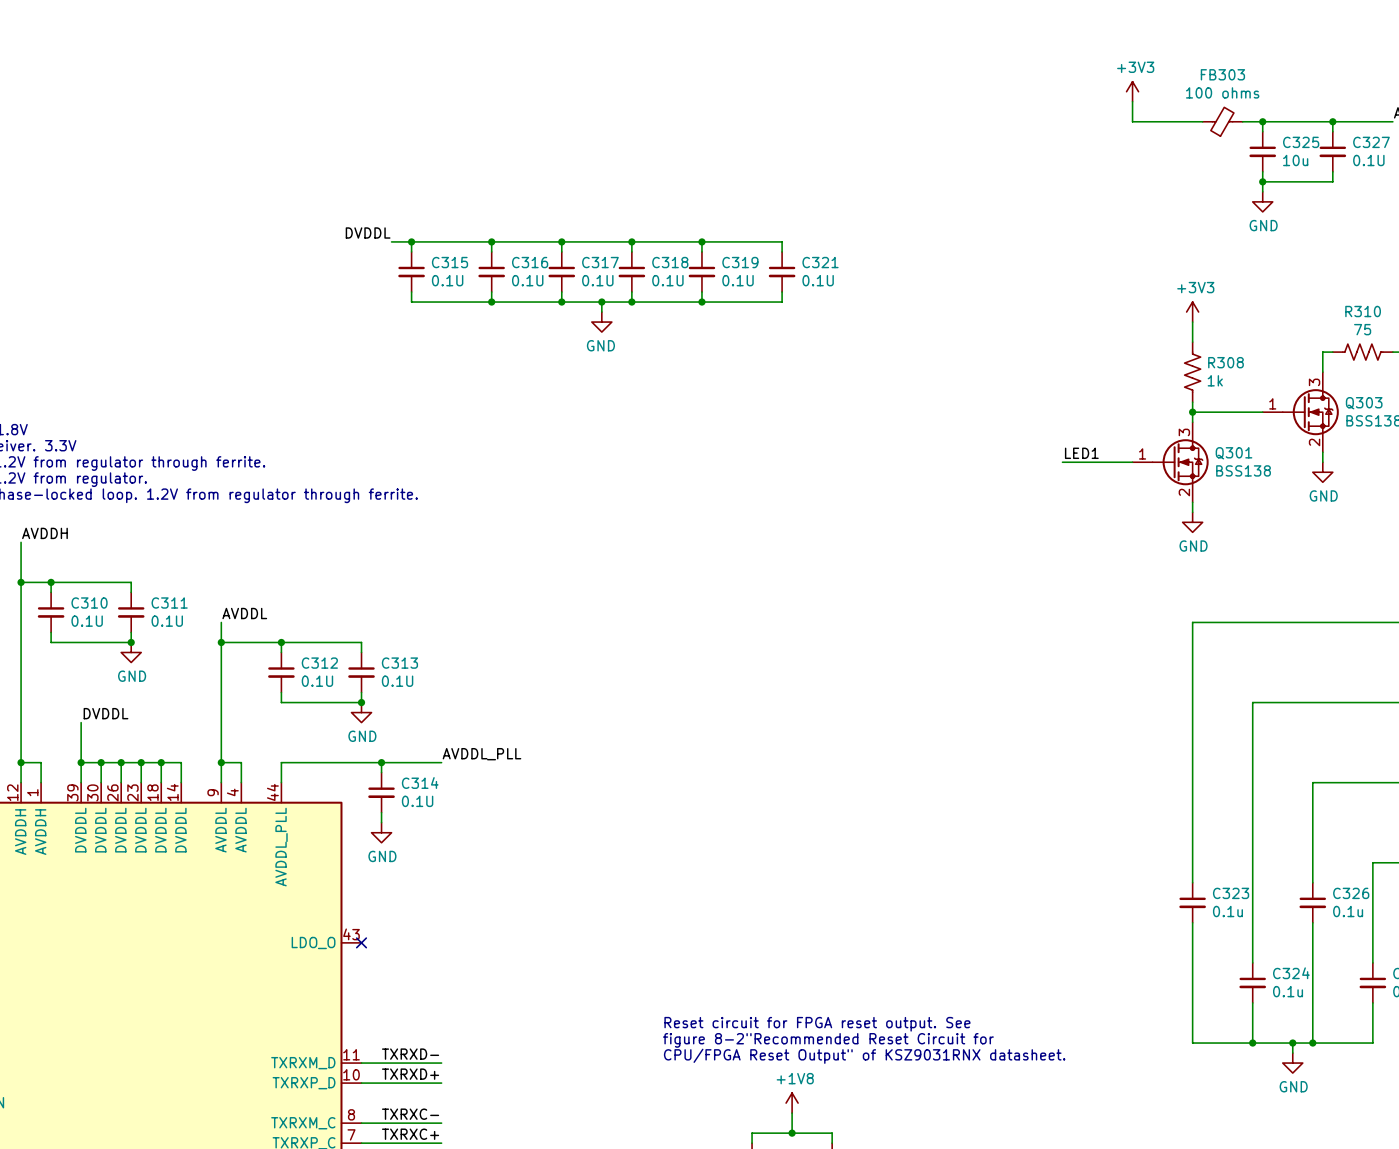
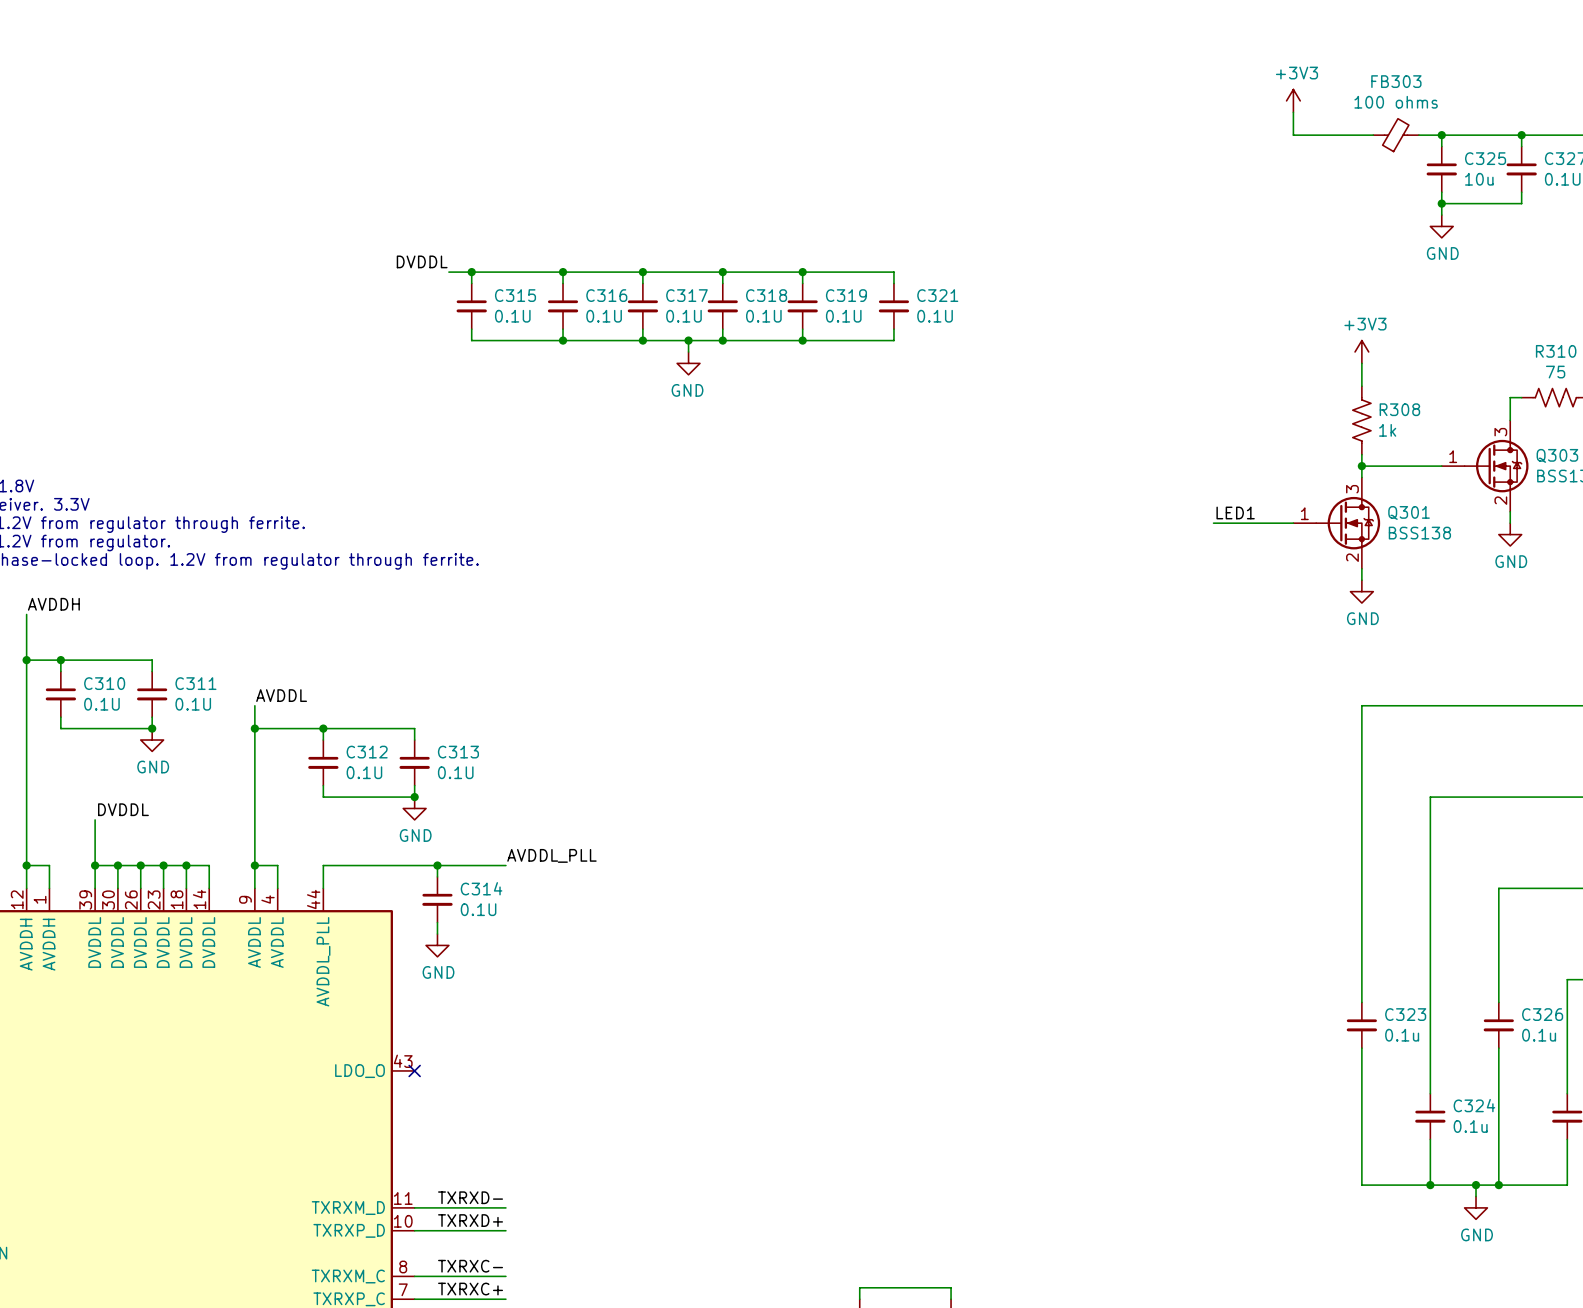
text: Reset circuit for FPGA reset output. See (817, 1024) -> none
text: figure 8-2"Recommended Reset Circuit for (828, 1040) -> none
text: CPU/FPGA Reset Output" of KSZ9031RNX datasheet. (864, 1056) -> none
power symbol: +1V8 (792, 1103) -> none
wire: (792, 1113) (792, 1133) -> none
junction: (792, 1133) -> none

